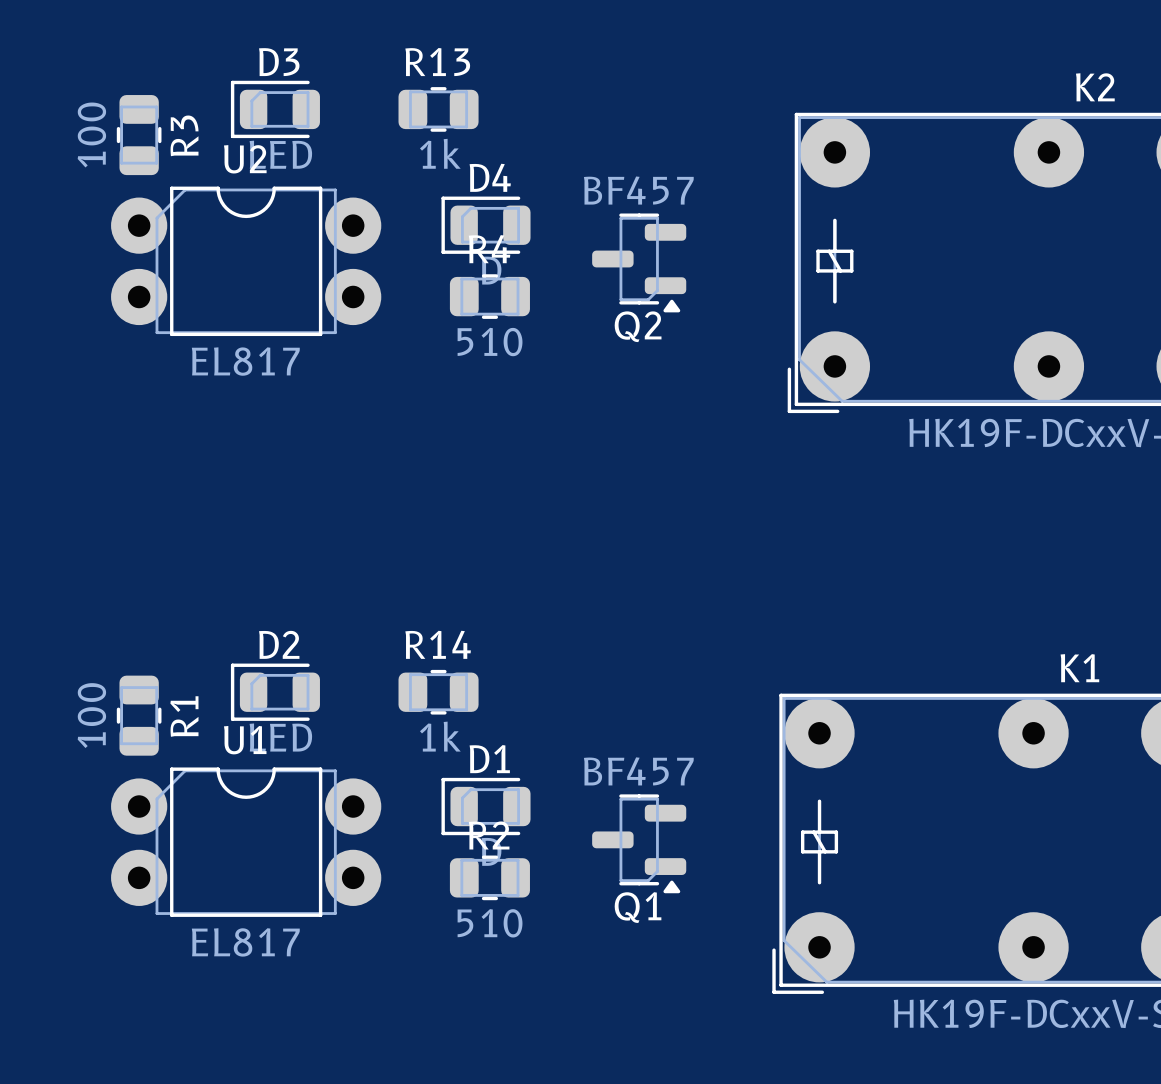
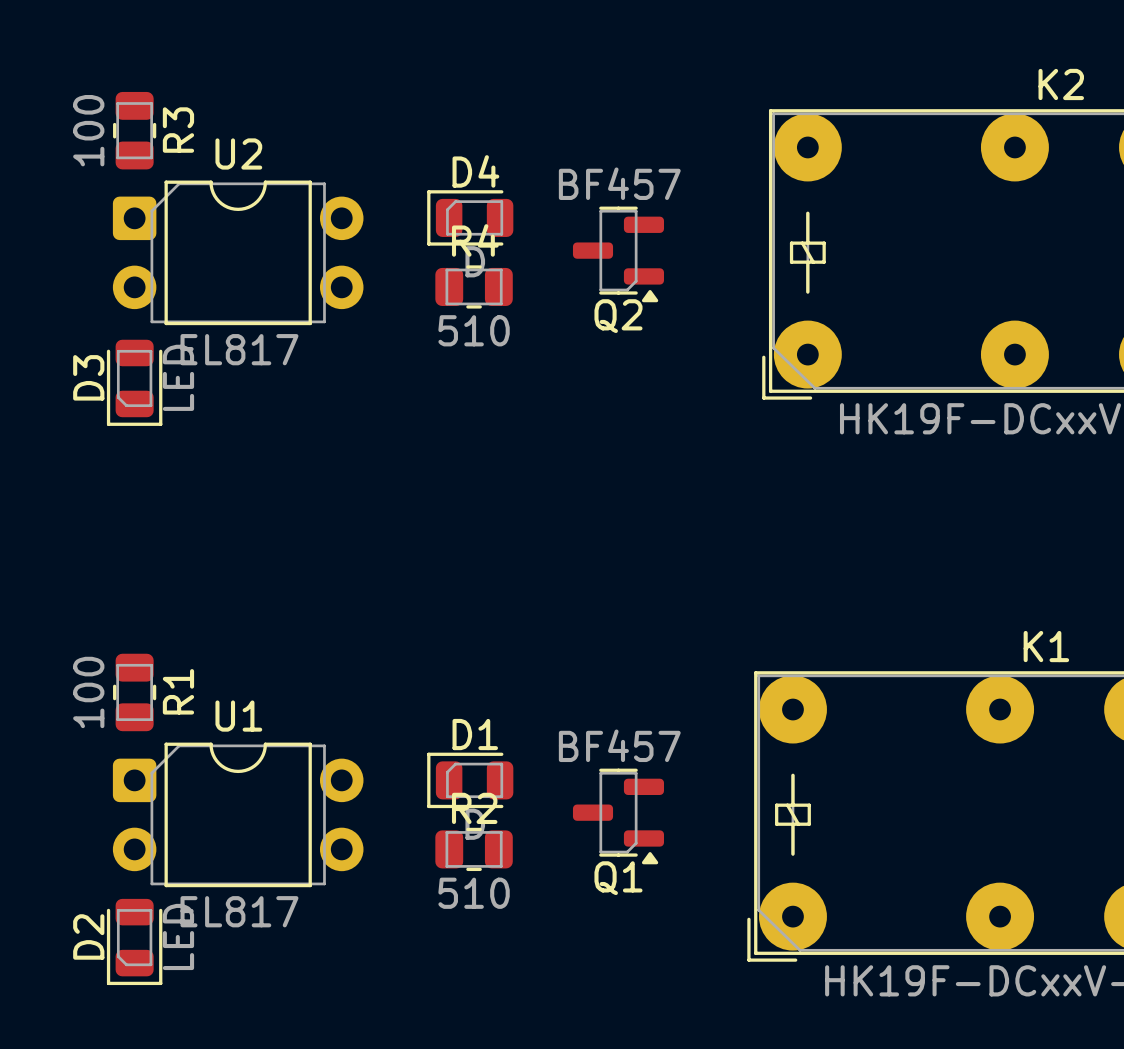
D3 rotation: 0° (275, 109) -> 90° counterclockwise (134, 382)
D3 position: (275, 109) -> (134, 382)
R13: 1k (438, 109) -> none
U2 footprint: [111, 186, 382, 337] -> [112, 180, 364, 326]
D2 rotation: 0° (275, 692) -> 90° counterclockwise (134, 941)
D2 position: (275, 692) -> (134, 941)
R14: 1k (438, 692) -> none
U1 footprint: [111, 767, 382, 917] -> [112, 742, 364, 888]

